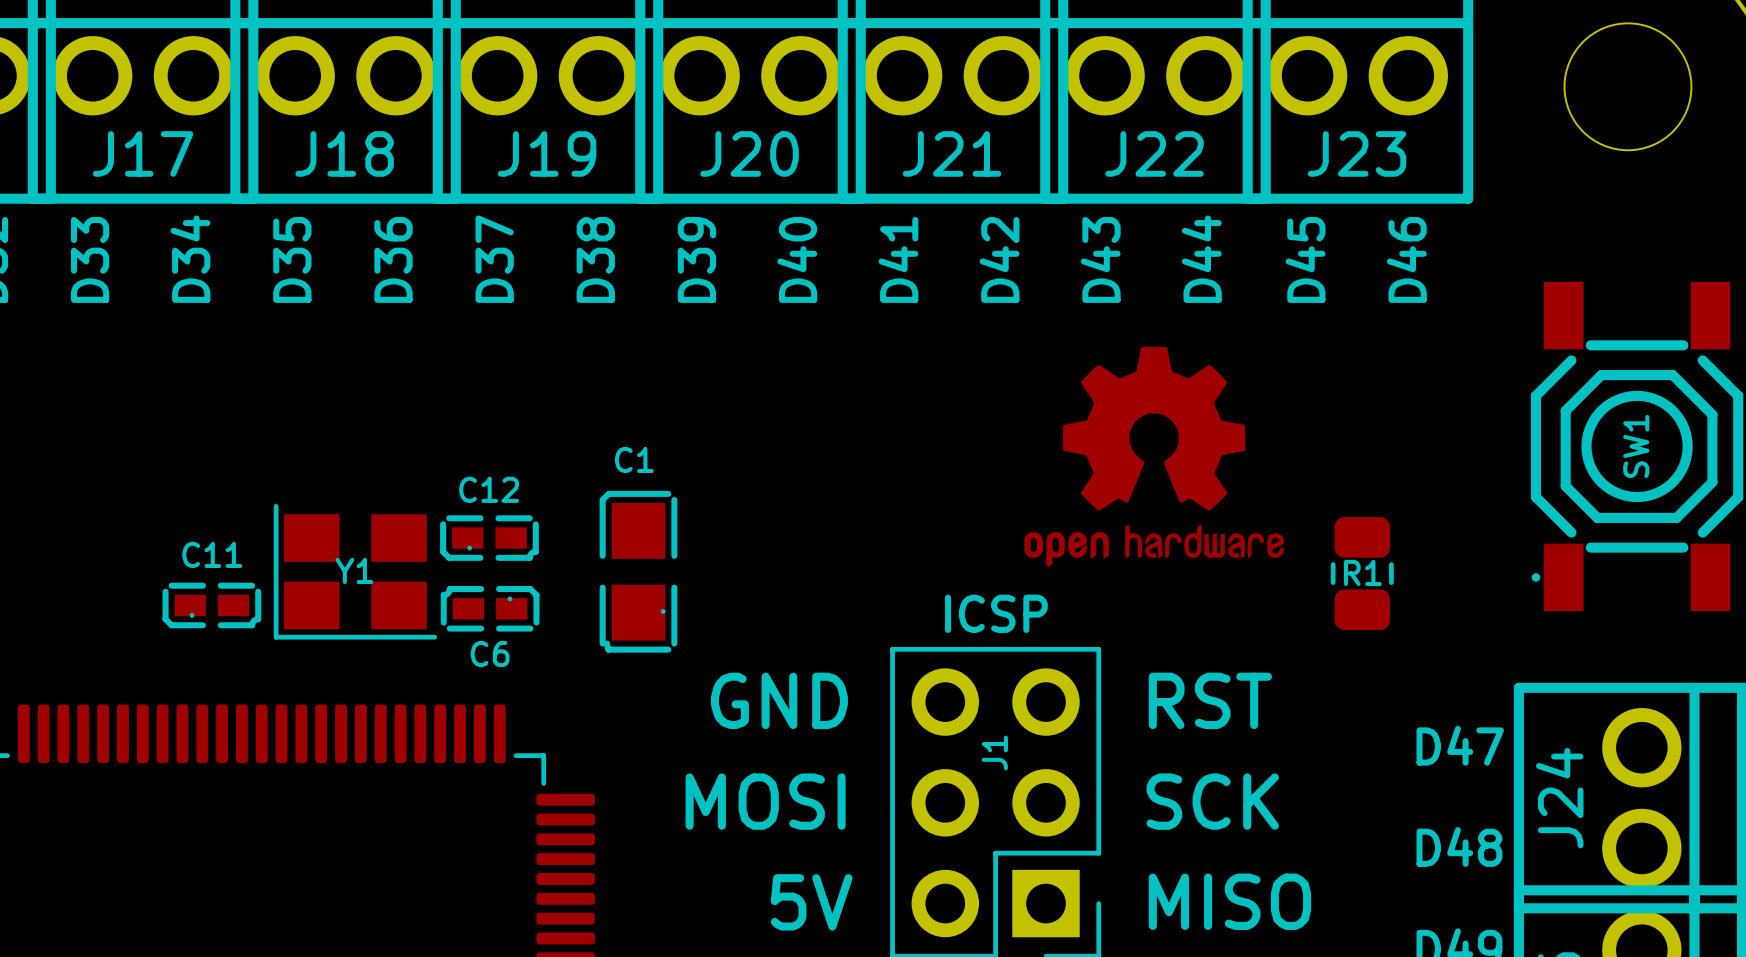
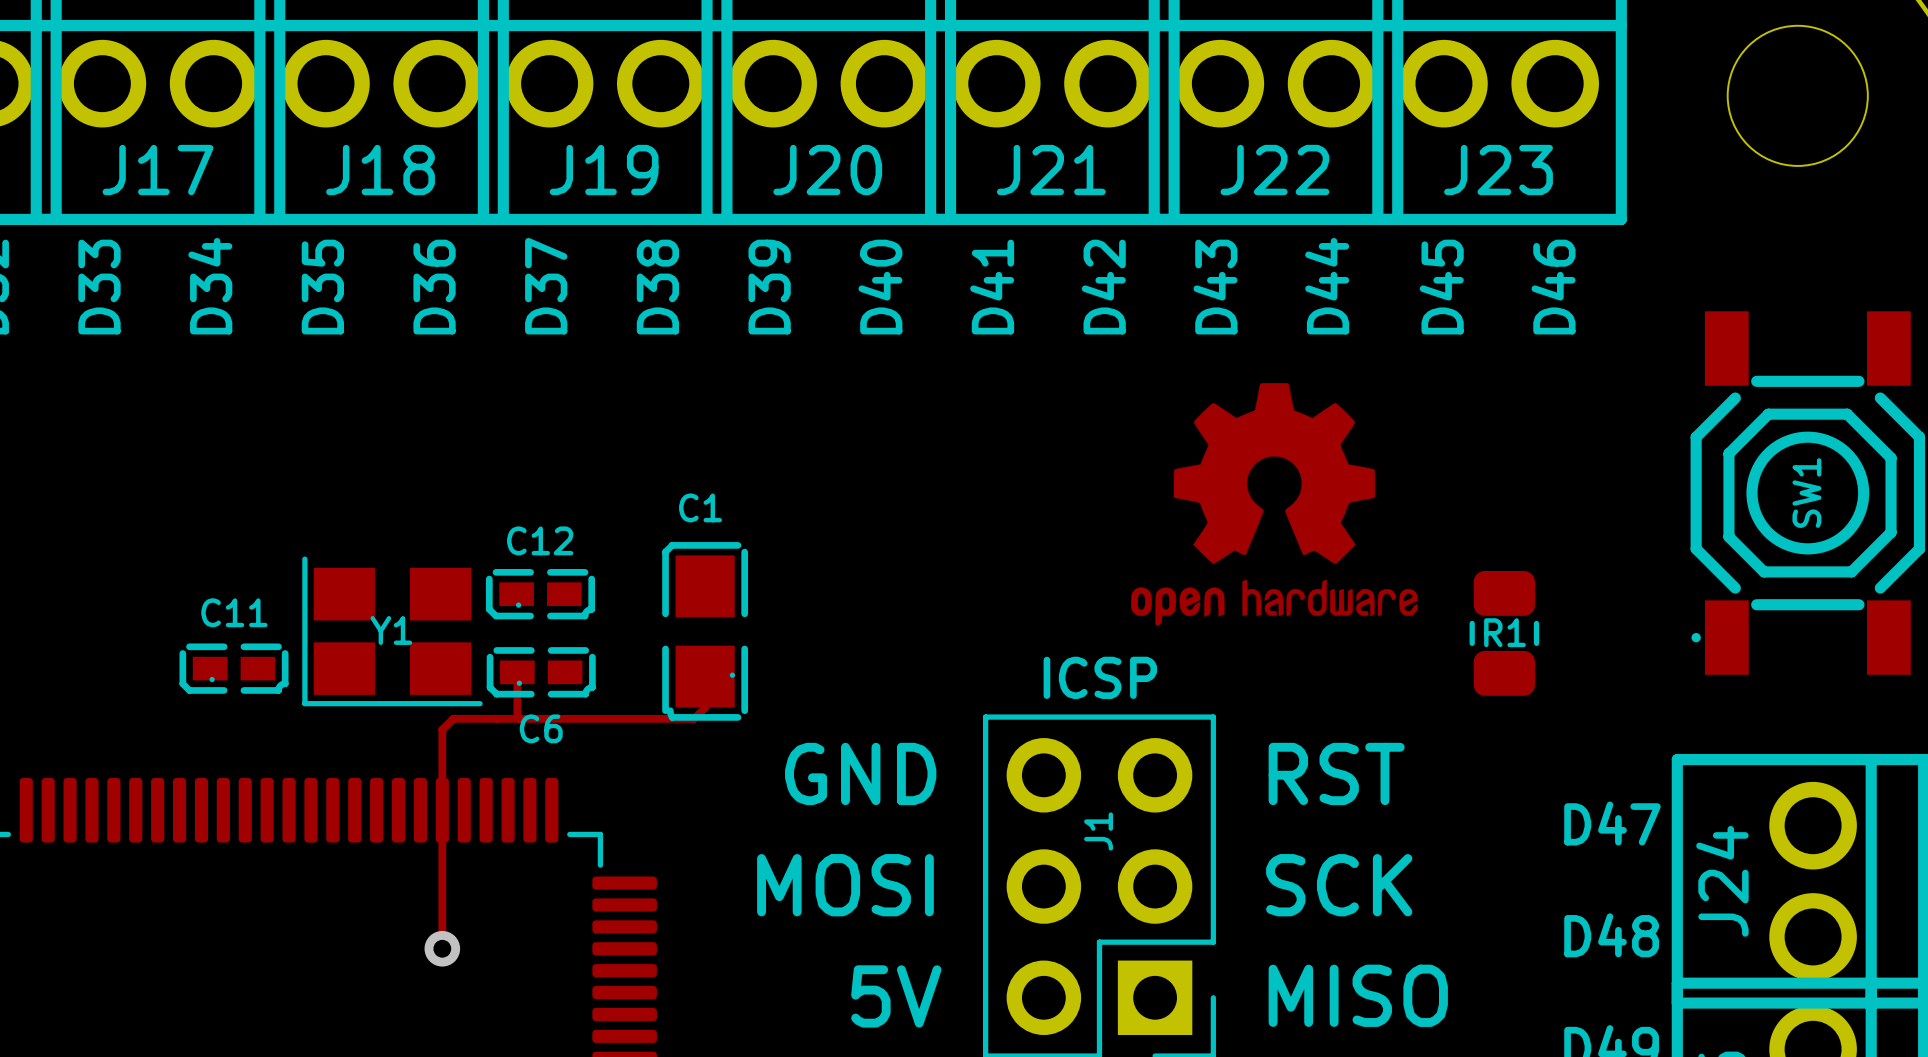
track: none -> (517, 672) (517, 717) (518, 718)
C6 rotation: 0° (490, 608) -> 180° (541, 672)
track: none -> (705, 676) (705, 707) (694, 718) (453, 718) (442, 729) (442, 948)
via: none -> (442, 948)

